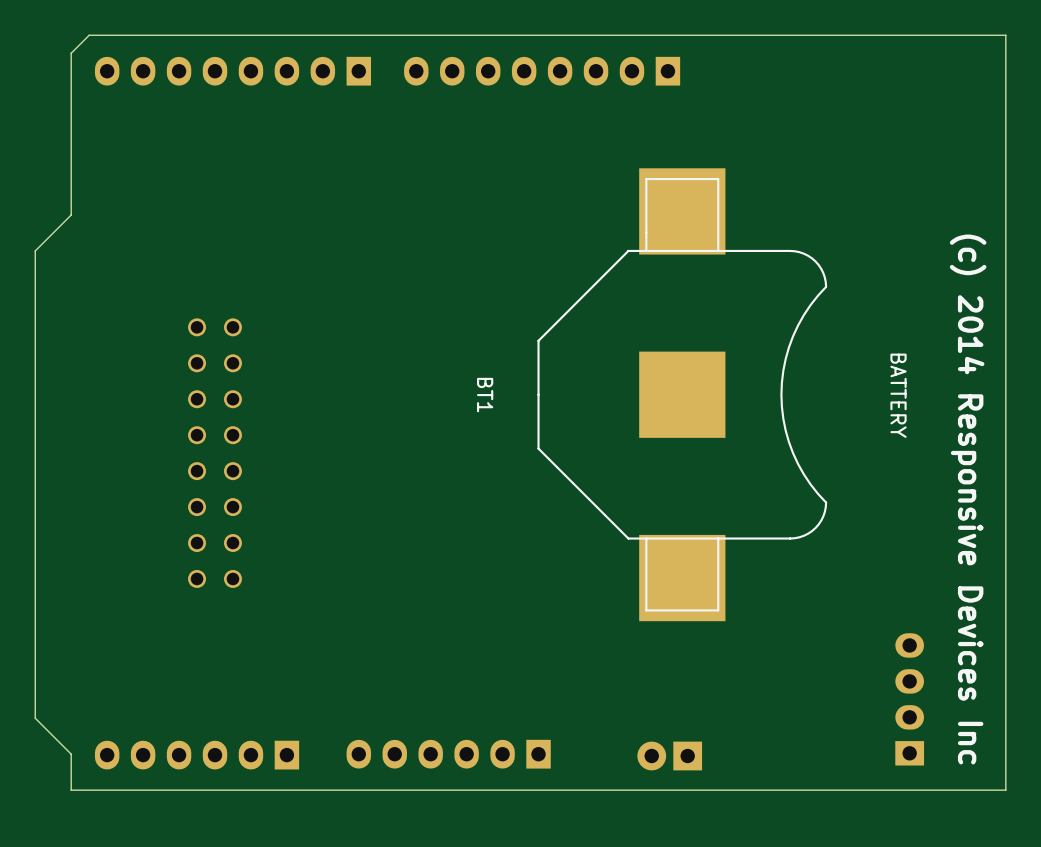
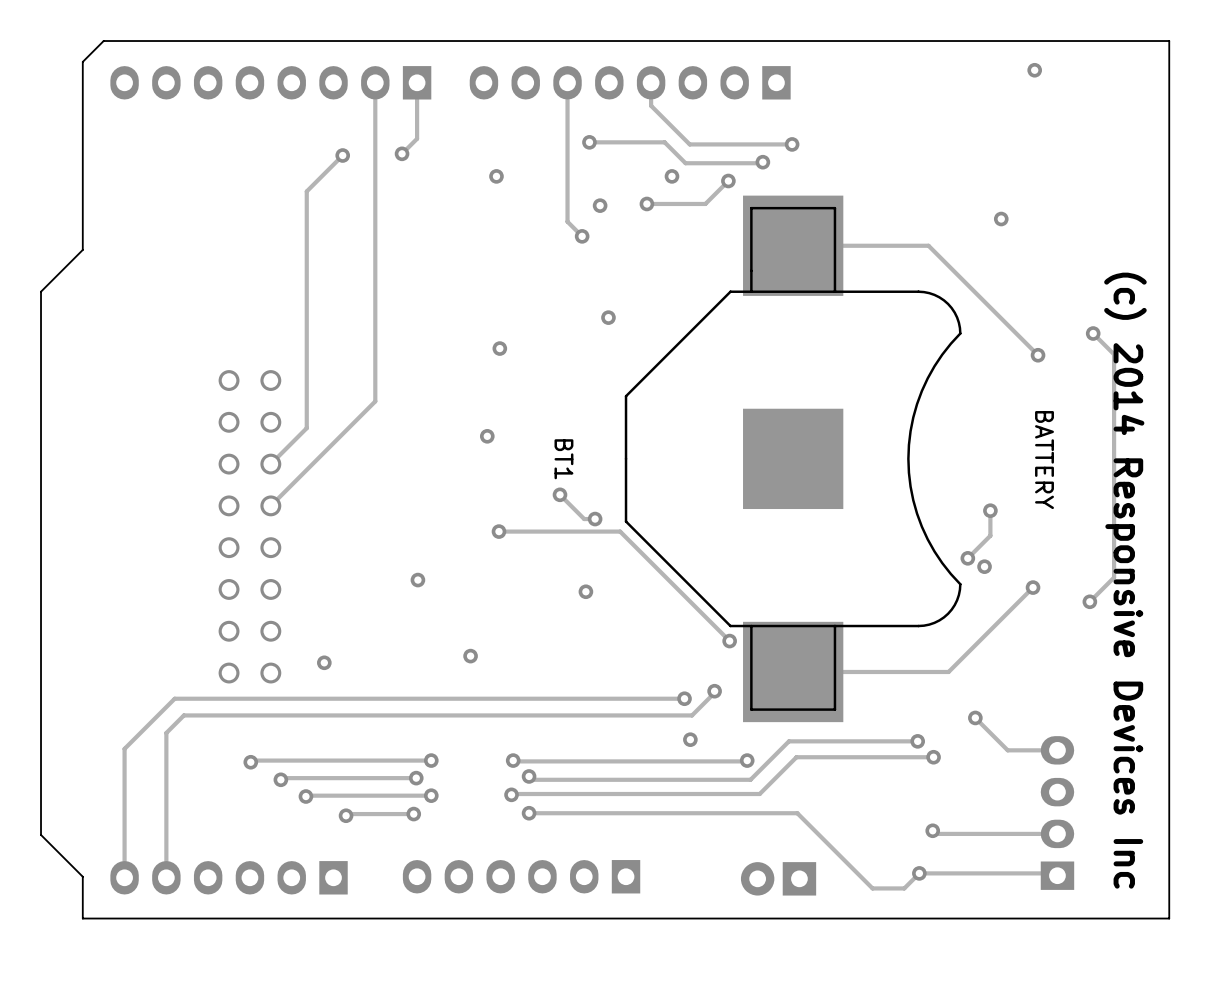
via: none -> (1034, 70)
track: none -> (375, 82) (375, 401) (270, 505)
track: none -> (417, 82) (417, 138) (402, 153)
track: none -> (567, 82) (567, 221) (582, 236)
track: none -> (651, 82) (651, 105) (689, 144) (792, 144)
track: none -> (589, 142) (664, 142) (685, 163) (762, 162)
via: none -> (589, 142)
via: none -> (792, 144)
via: none -> (402, 153)
track: none -> (342, 155) (306, 191) (306, 428) (270, 464)
via: none -> (342, 155)
via: none -> (762, 162)
via: none -> (496, 176)
via: none -> (671, 176)
track: none -> (728, 180) (705, 203) (646, 203)
via: none -> (728, 180)
via: none -> (646, 203)
via: none -> (600, 205)
via: none -> (1001, 219)
via: none -> (582, 236)
track: none -> (793, 245) (928, 245) (1038, 355)
via: none -> (608, 317)
track: none -> (1093, 333) (1114, 354) (1114, 577) (1089, 601)
via: none -> (1093, 333)
via: none -> (499, 348)
via: none -> (1038, 355)
via: none -> (487, 436)
track: none -> (560, 494) (584, 519) (595, 519)
via: none -> (560, 494)
track: none -> (990, 510) (990, 535) (967, 558)
via: none -> (990, 510)
via: none -> (595, 519)
track: none -> (498, 531) (620, 531) (729, 641)
via: none -> (498, 531)
via: none -> (967, 558)
via: none -> (984, 566)
via: none -> (417, 580)
track: none -> (1033, 587) (948, 671) (793, 671)
via: none -> (1033, 587)
via: none -> (585, 591)
via: none -> (1089, 601)
via: none -> (729, 641)
via: none -> (470, 656)
via: none -> (324, 662)
track: none -> (714, 691) (692, 715) (183, 715) (166, 732) (166, 877)
via: none -> (714, 691)
track: none -> (684, 698) (174, 698) (124, 748) (124, 877)
via: none -> (684, 698)
track: none -> (975, 717) (1007, 750) (1057, 750)
via: none -> (975, 717)
via: none -> (690, 739)
track: none -> (917, 741) (788, 741) (750, 779) (532, 779) (529, 776)
via: none -> (917, 741)
track: none -> (933, 757) (796, 757) (759, 794) (511, 794)
via: none -> (933, 757)
track: none -> (431, 760) (252, 760) (250, 762)
via: none -> (431, 760)
via: none -> (513, 760)
track: none -> (747, 760) (513, 760)
via: none -> (747, 760)
via: none -> (250, 762)
via: none -> (529, 776)
track: none -> (416, 778) (282, 778) (280, 779)
via: none -> (416, 778)
via: none -> (280, 779)
via: none -> (511, 794)
track: none -> (431, 795) (305, 796)
via: none -> (431, 795)
via: none -> (305, 796)
track: none -> (529, 813) (797, 813) (872, 888) (904, 888) (919, 873) (1055, 873) (1057, 875)
via: none -> (529, 813)
track: none -> (413, 814) (347, 814) (346, 815)
via: none -> (413, 814)
via: none -> (346, 815)
track: none -> (932, 830) (935, 833) (1057, 833)
via: none -> (932, 830)
via: none -> (919, 873)

